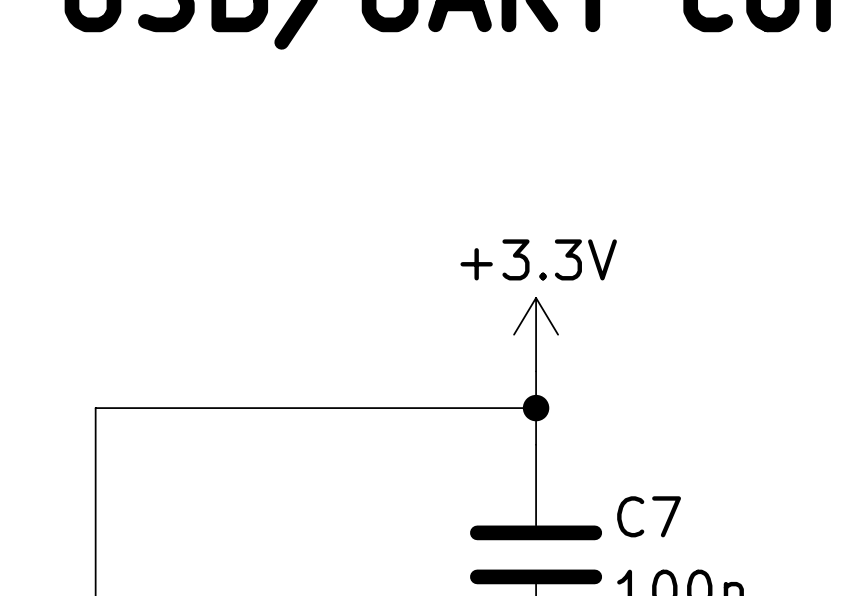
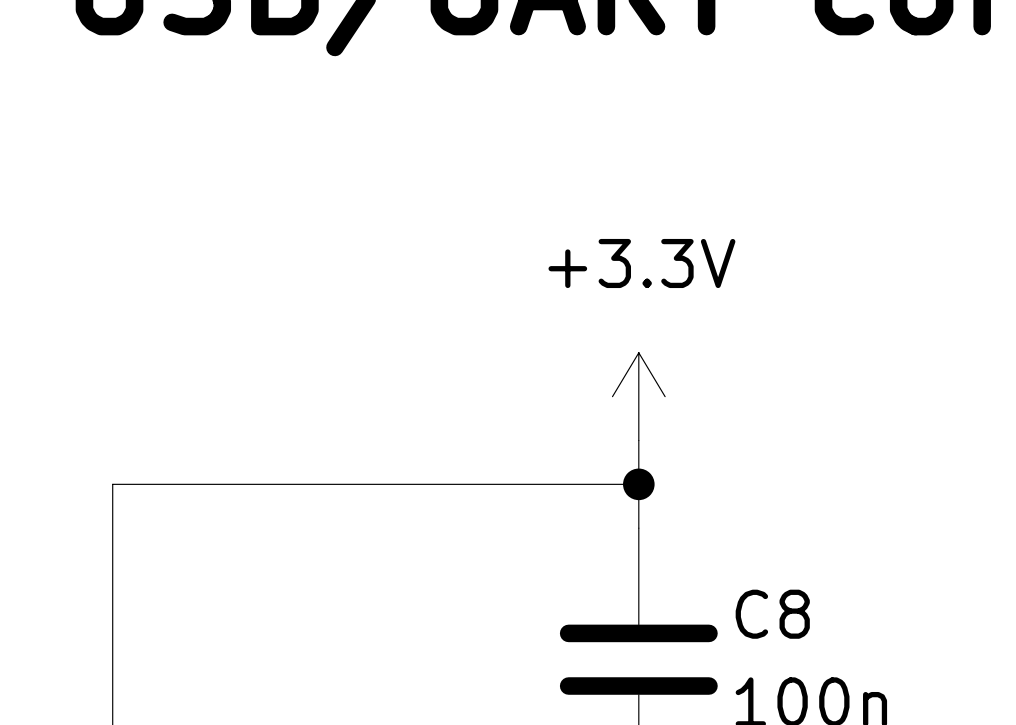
power symbol text position: +3.3V (538, 259) -> +3.3V (641, 263)
C7 name: C7 (649, 516) -> C8 (772, 614)

